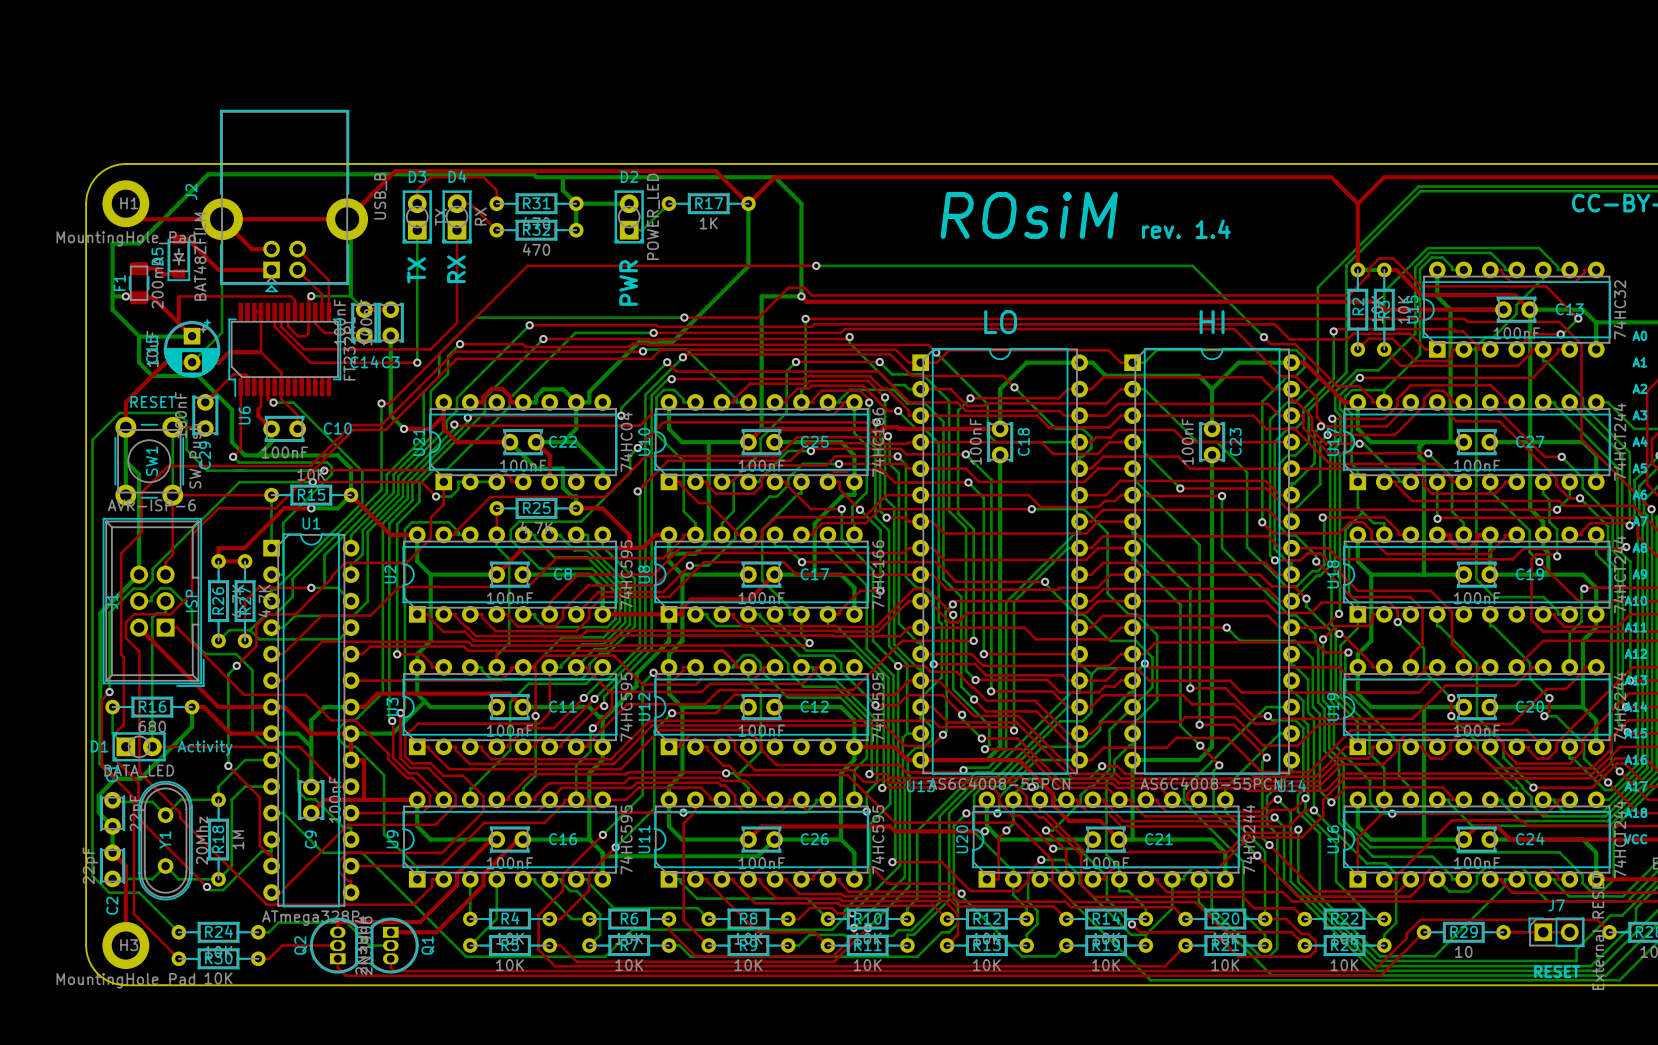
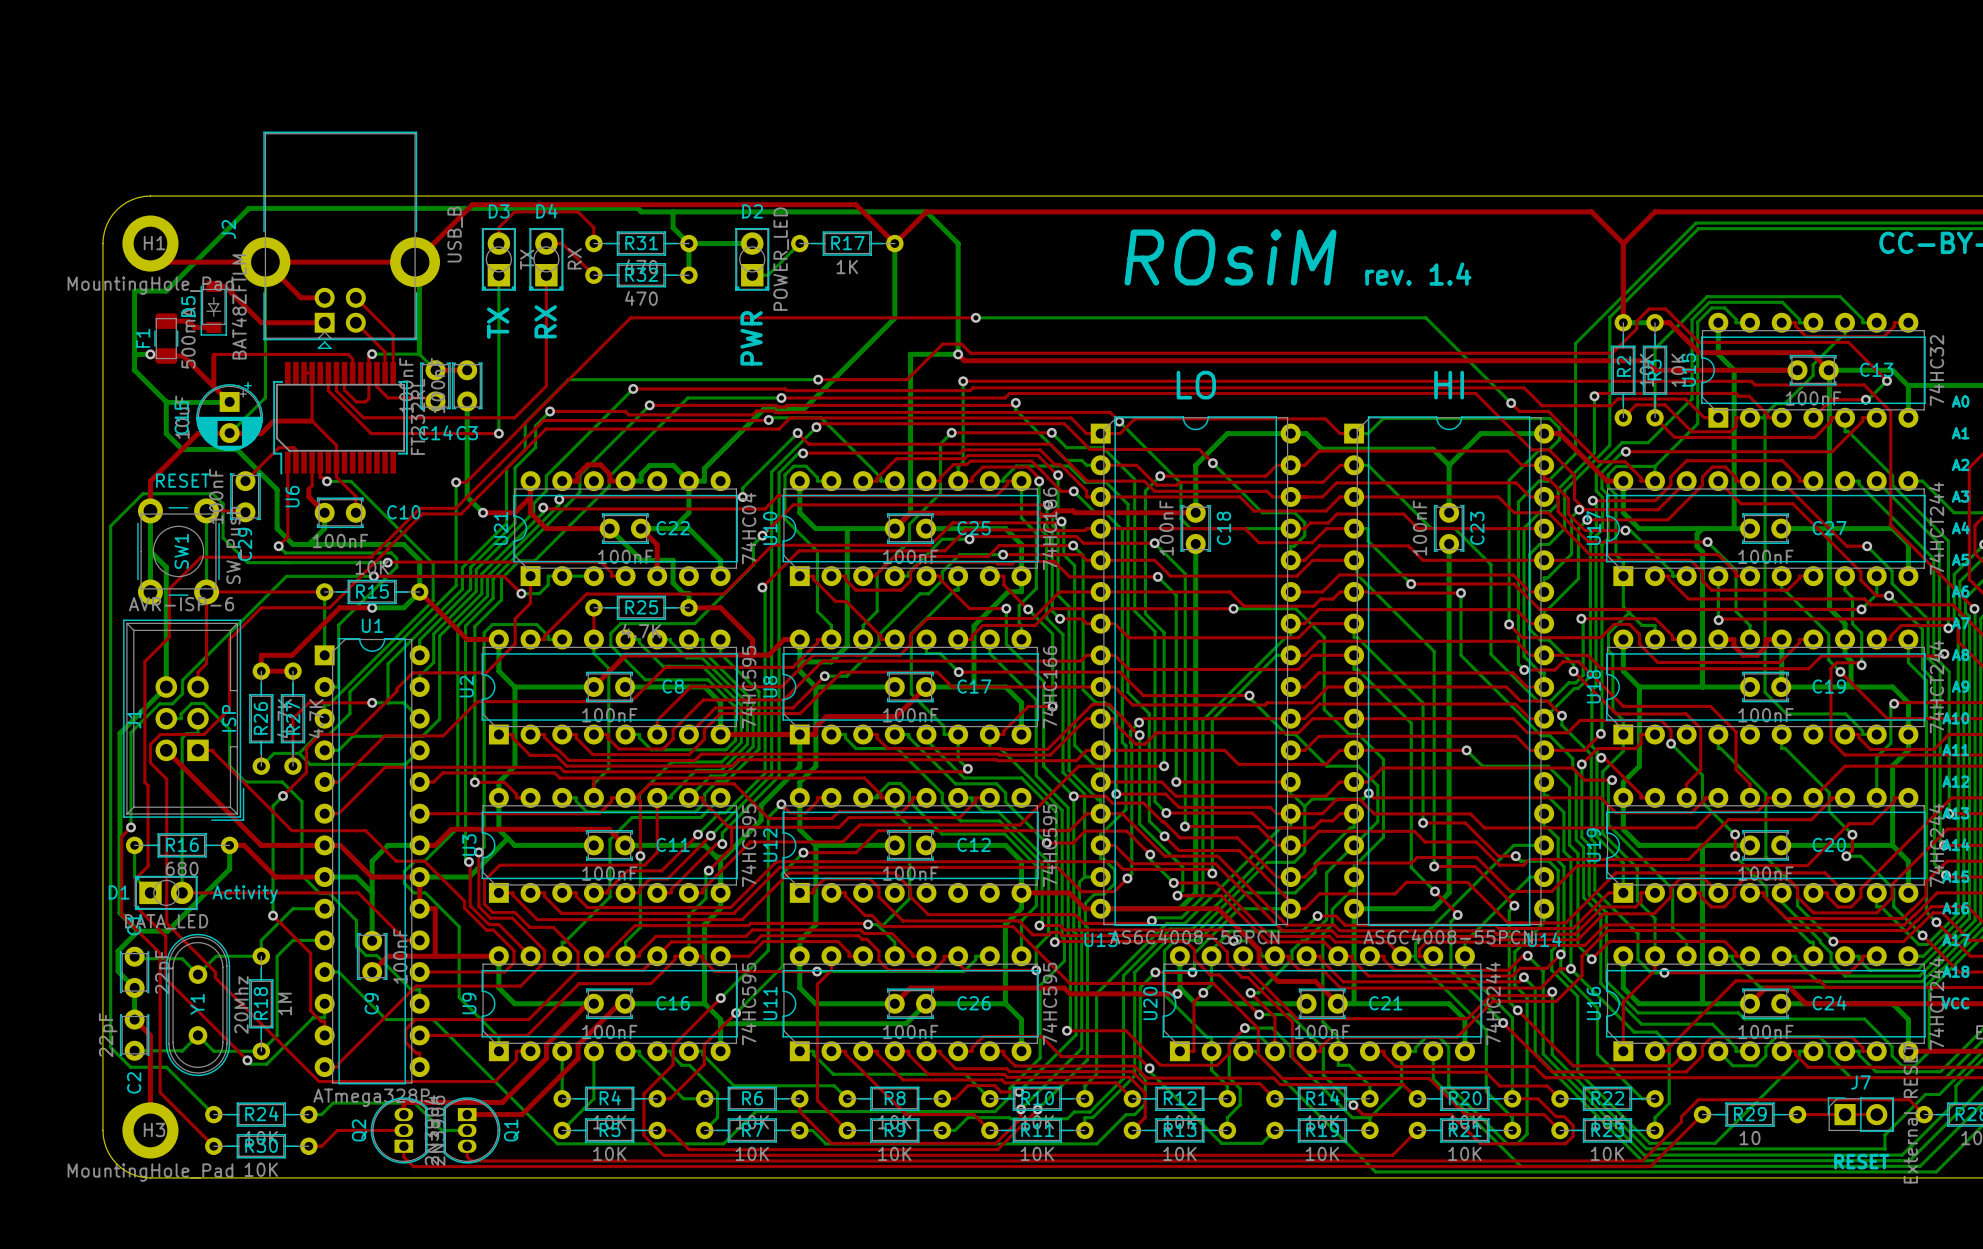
F1 value: 200mA (157, 282) -> 500mA (188, 337)

